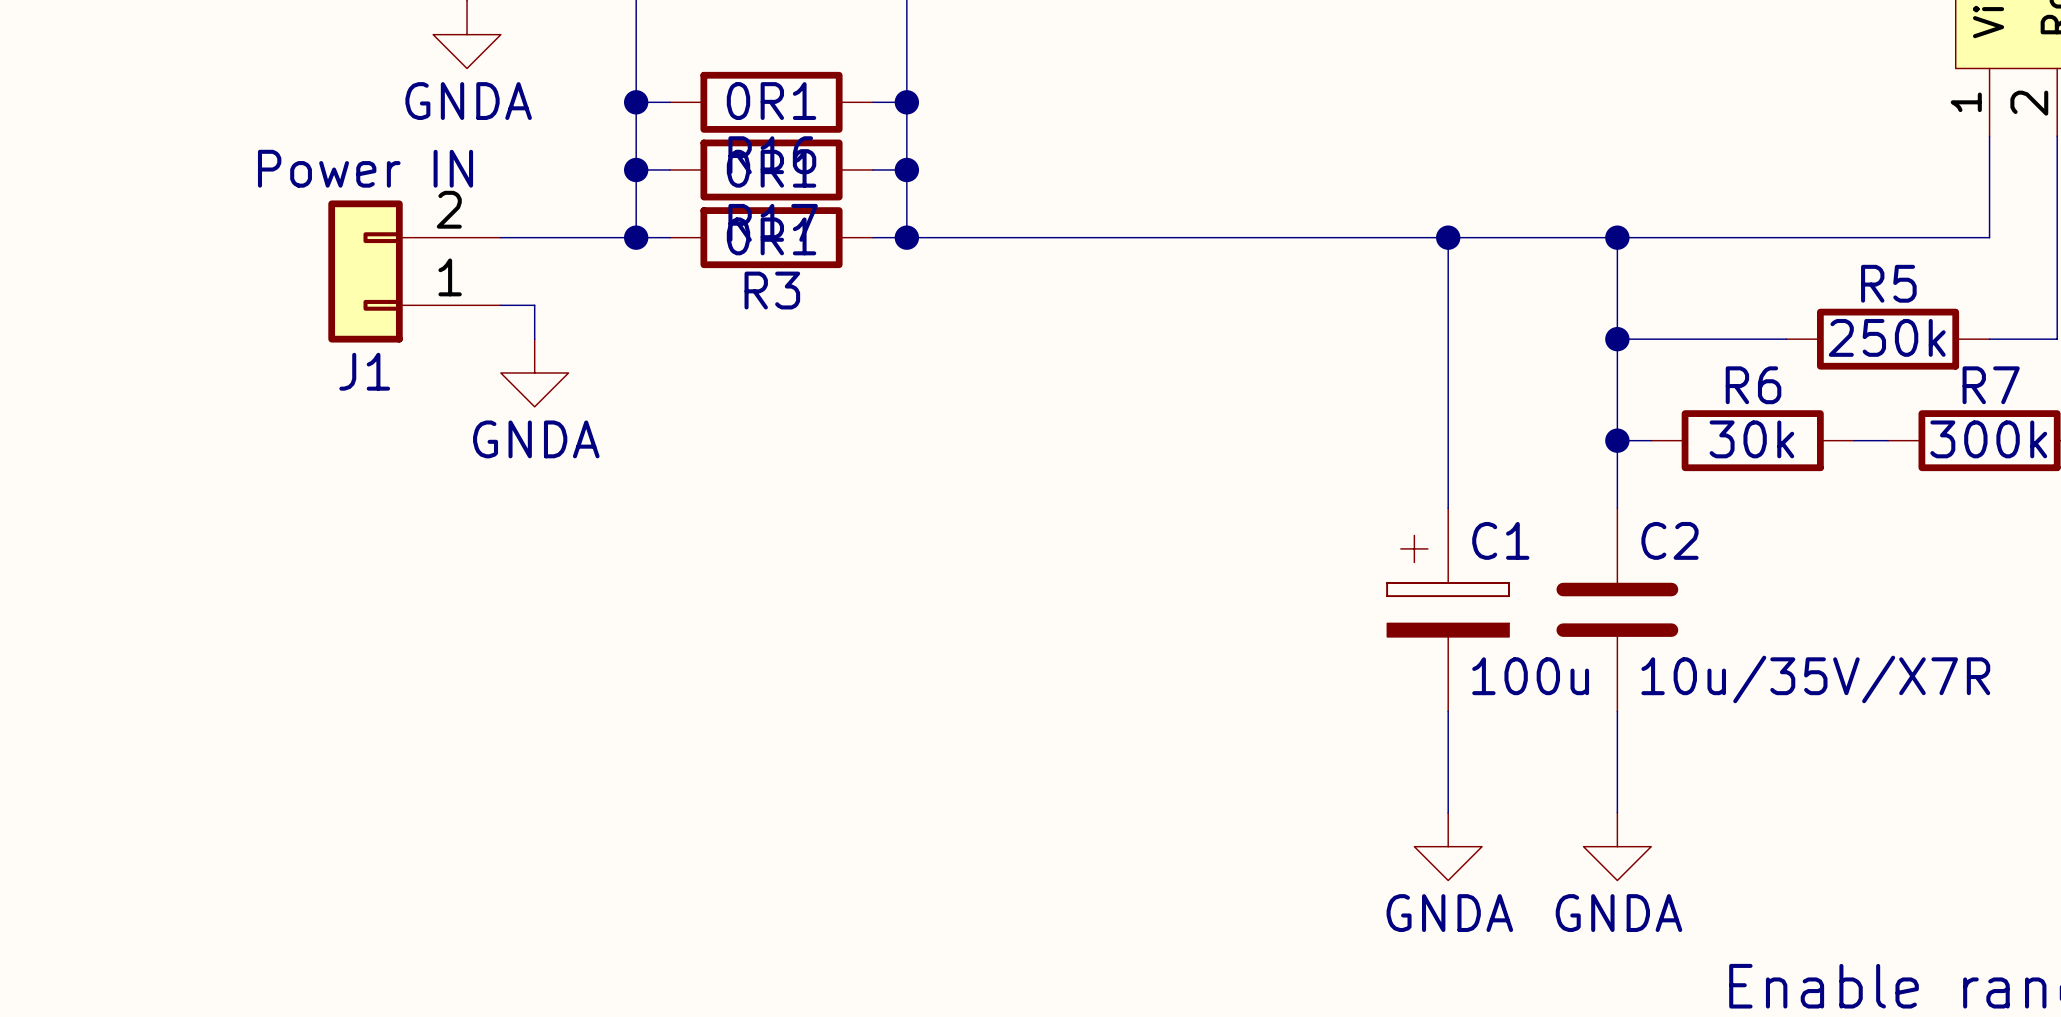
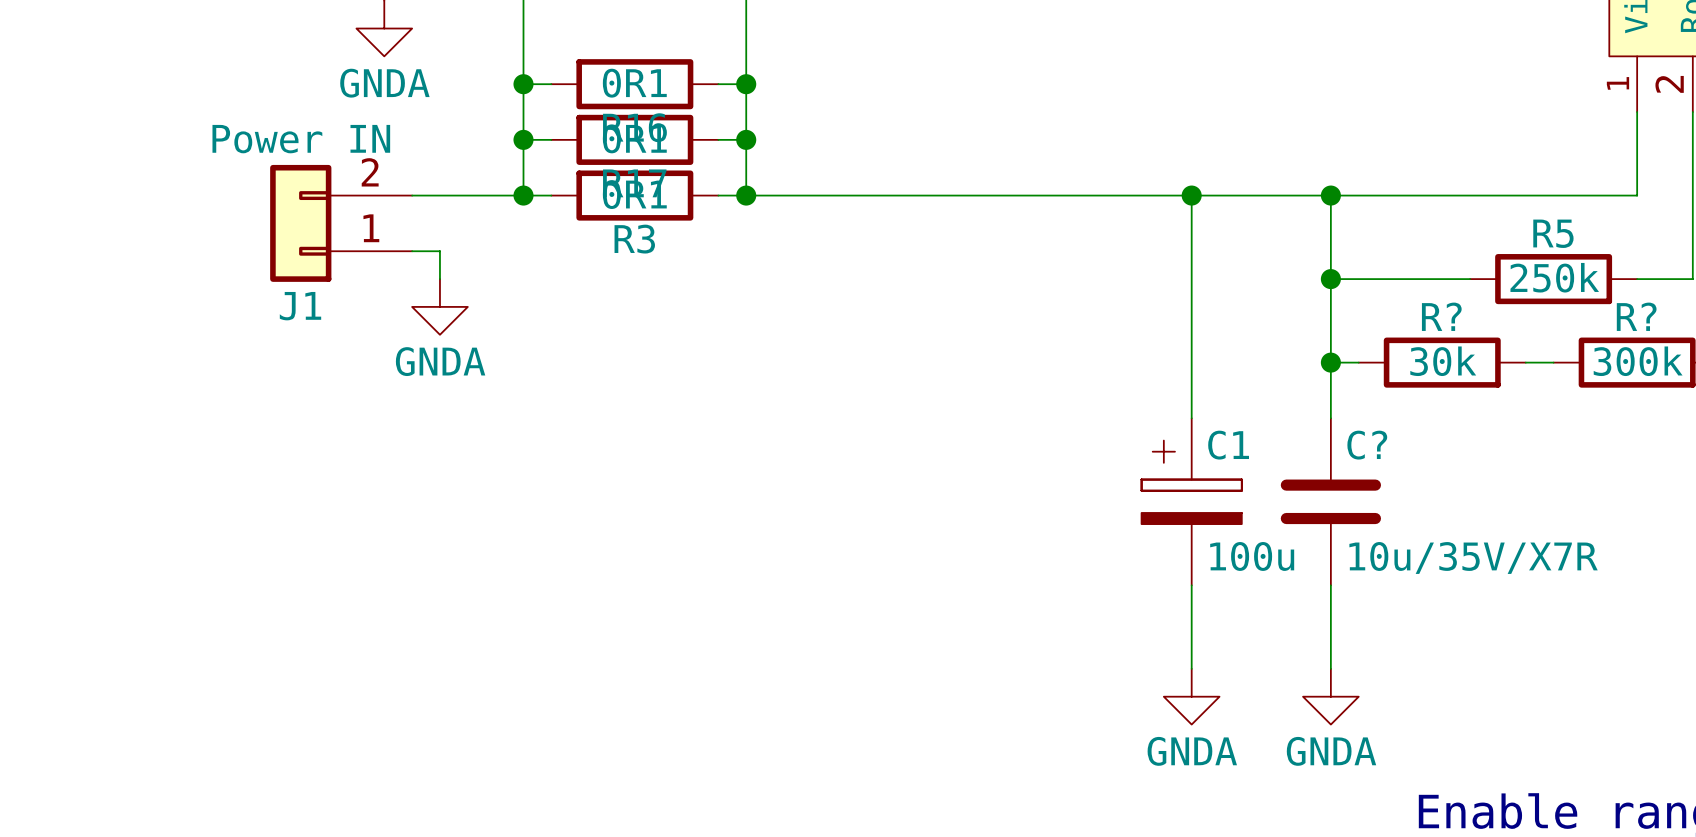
R6 name: R6 (1753, 385) -> R? (1441, 316)
R7 name: R7 (1991, 385) -> R? (1636, 316)
C2 name: C2 (1669, 540) -> C? (1367, 445)

